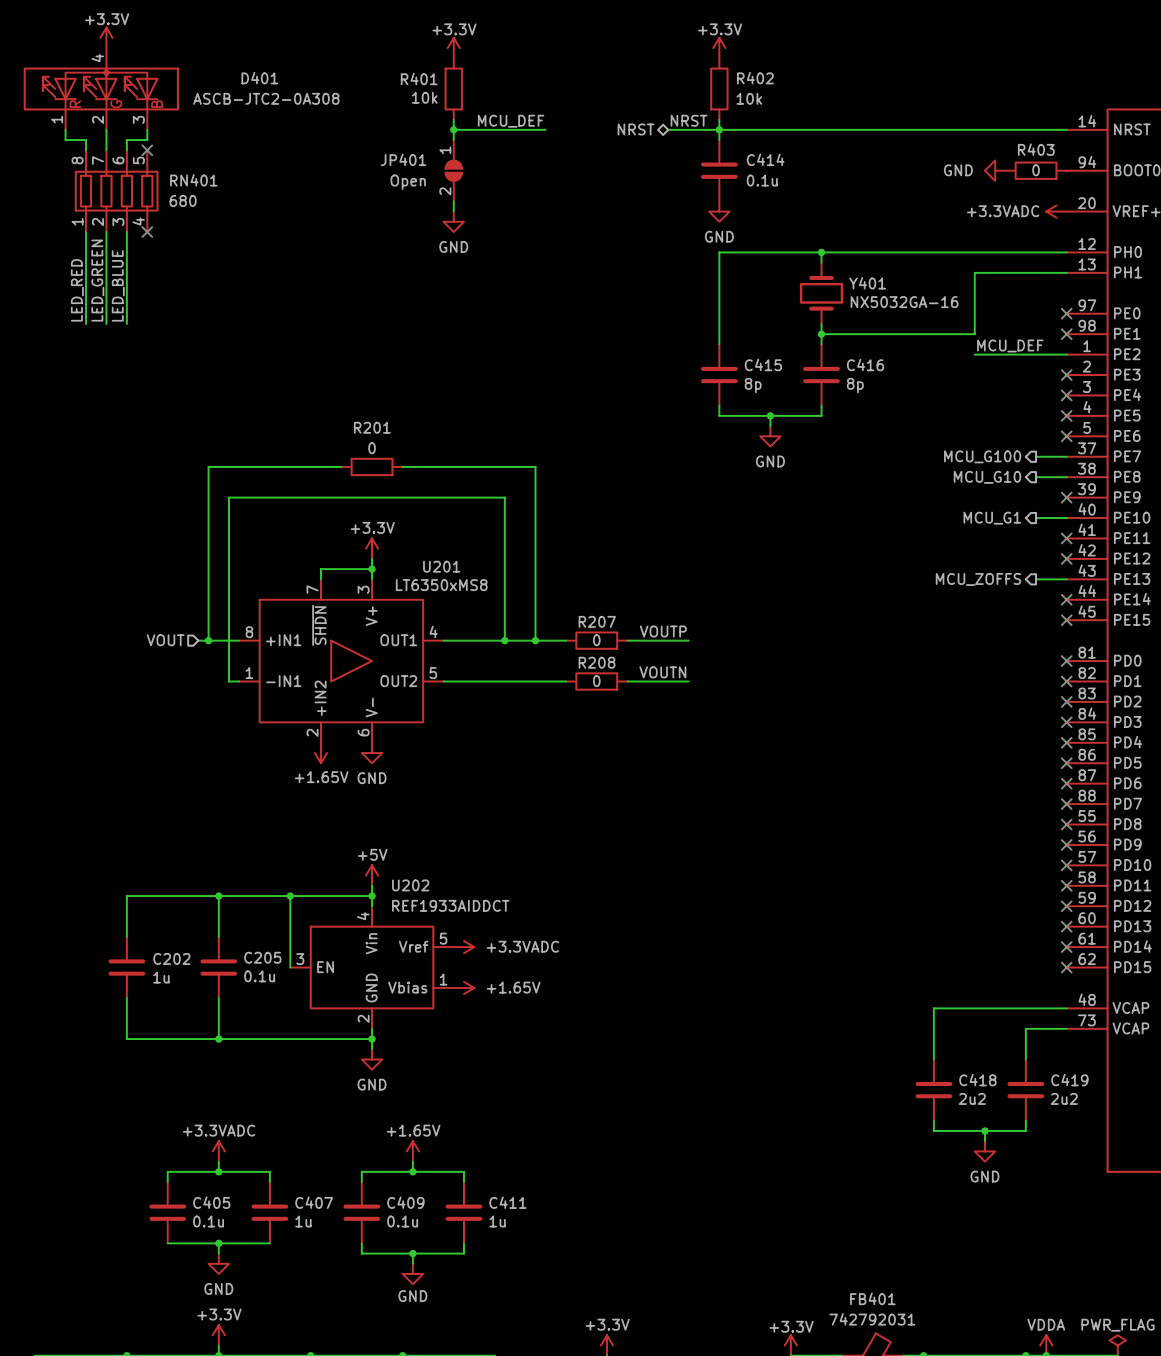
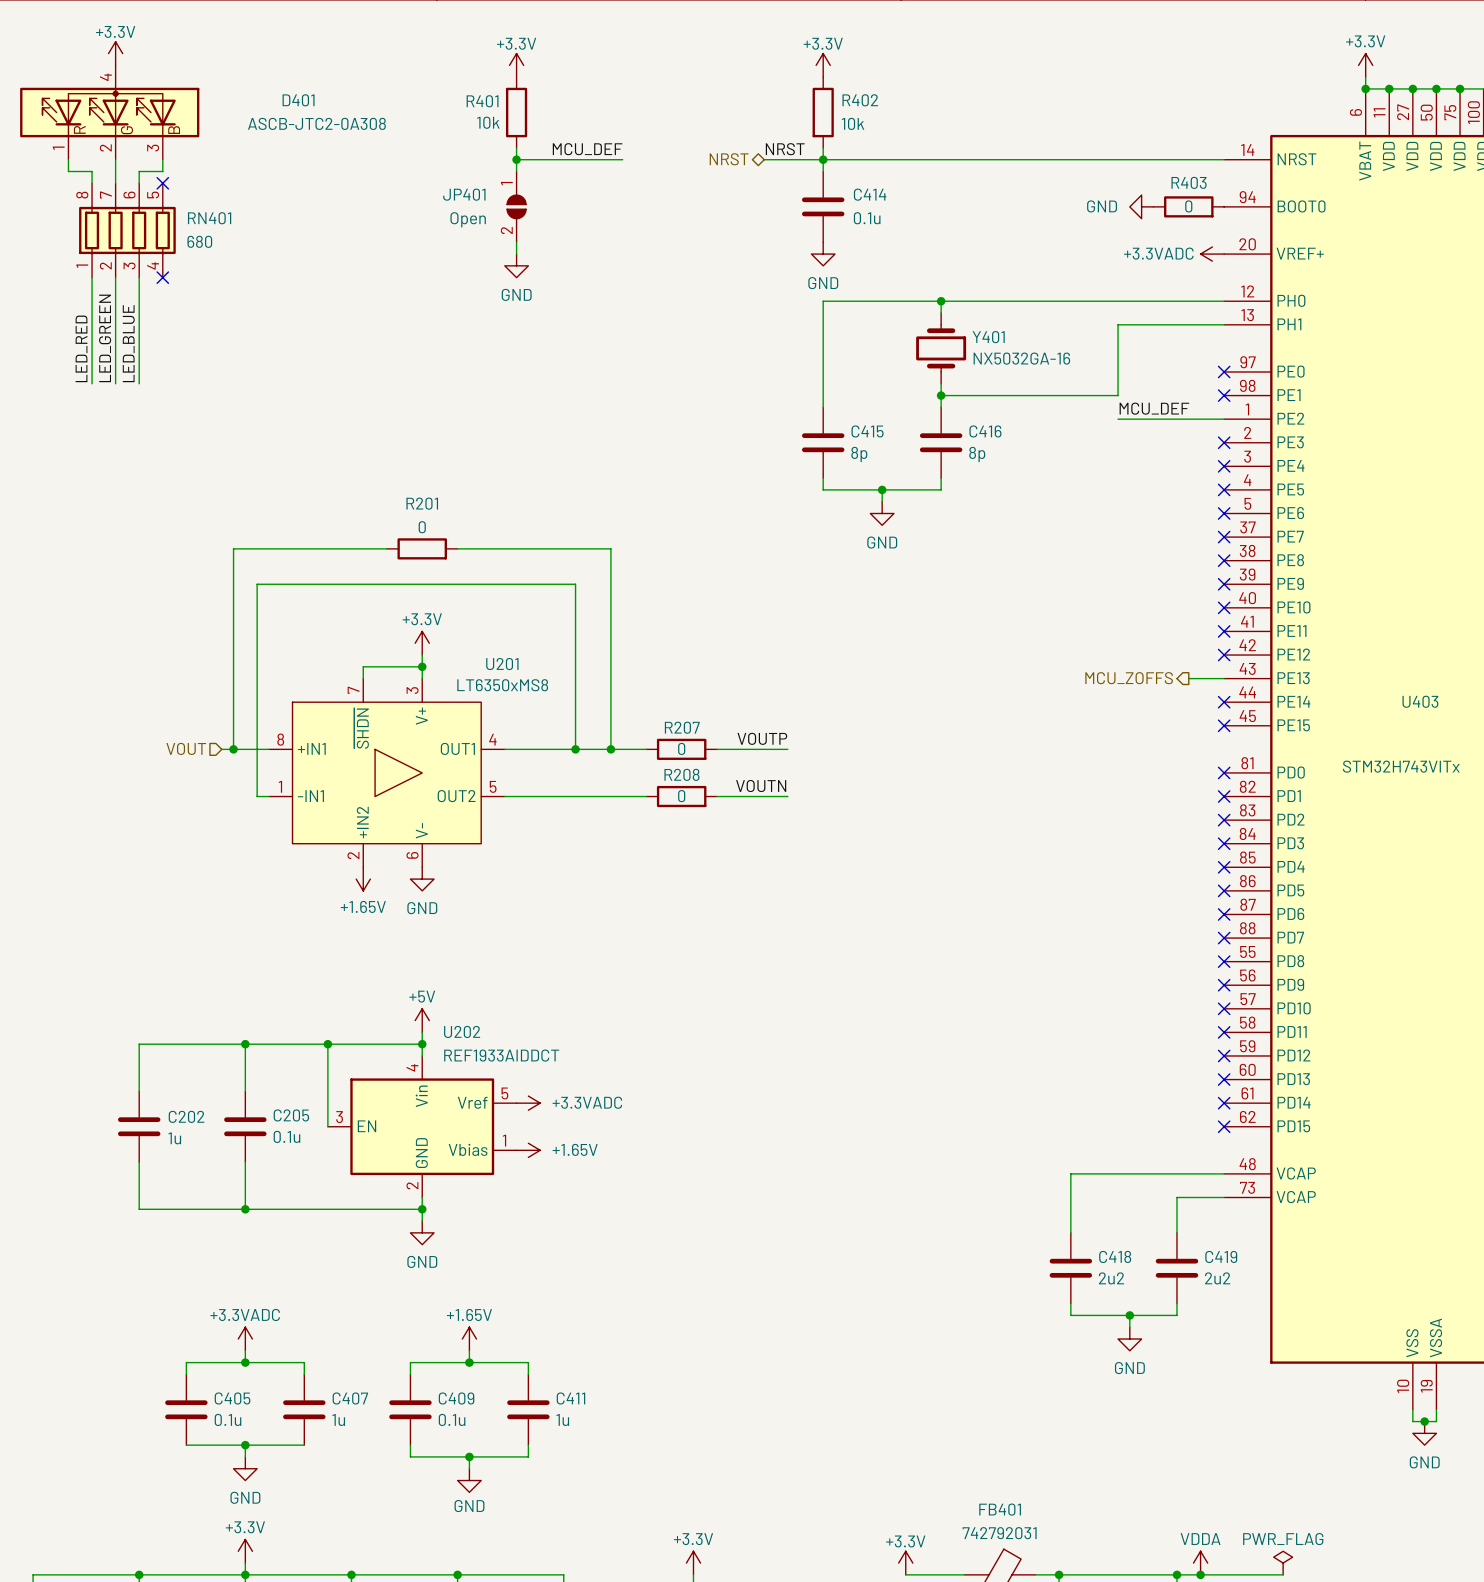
hierarchical label: MCU_G100 (982, 456) -> none
wire: (1036, 456) (1066, 456) -> none
no-connect mark: none -> (1224, 537)
hierarchical label: MCU_G10 (987, 477) -> none
wire: (1036, 477) (1066, 477) -> none
no-connect mark: none -> (1224, 560)
hierarchical label: MCU_G1 (992, 518) -> none
wire: (1036, 518) (1066, 518) -> none
no-connect mark: none -> (1224, 607)

